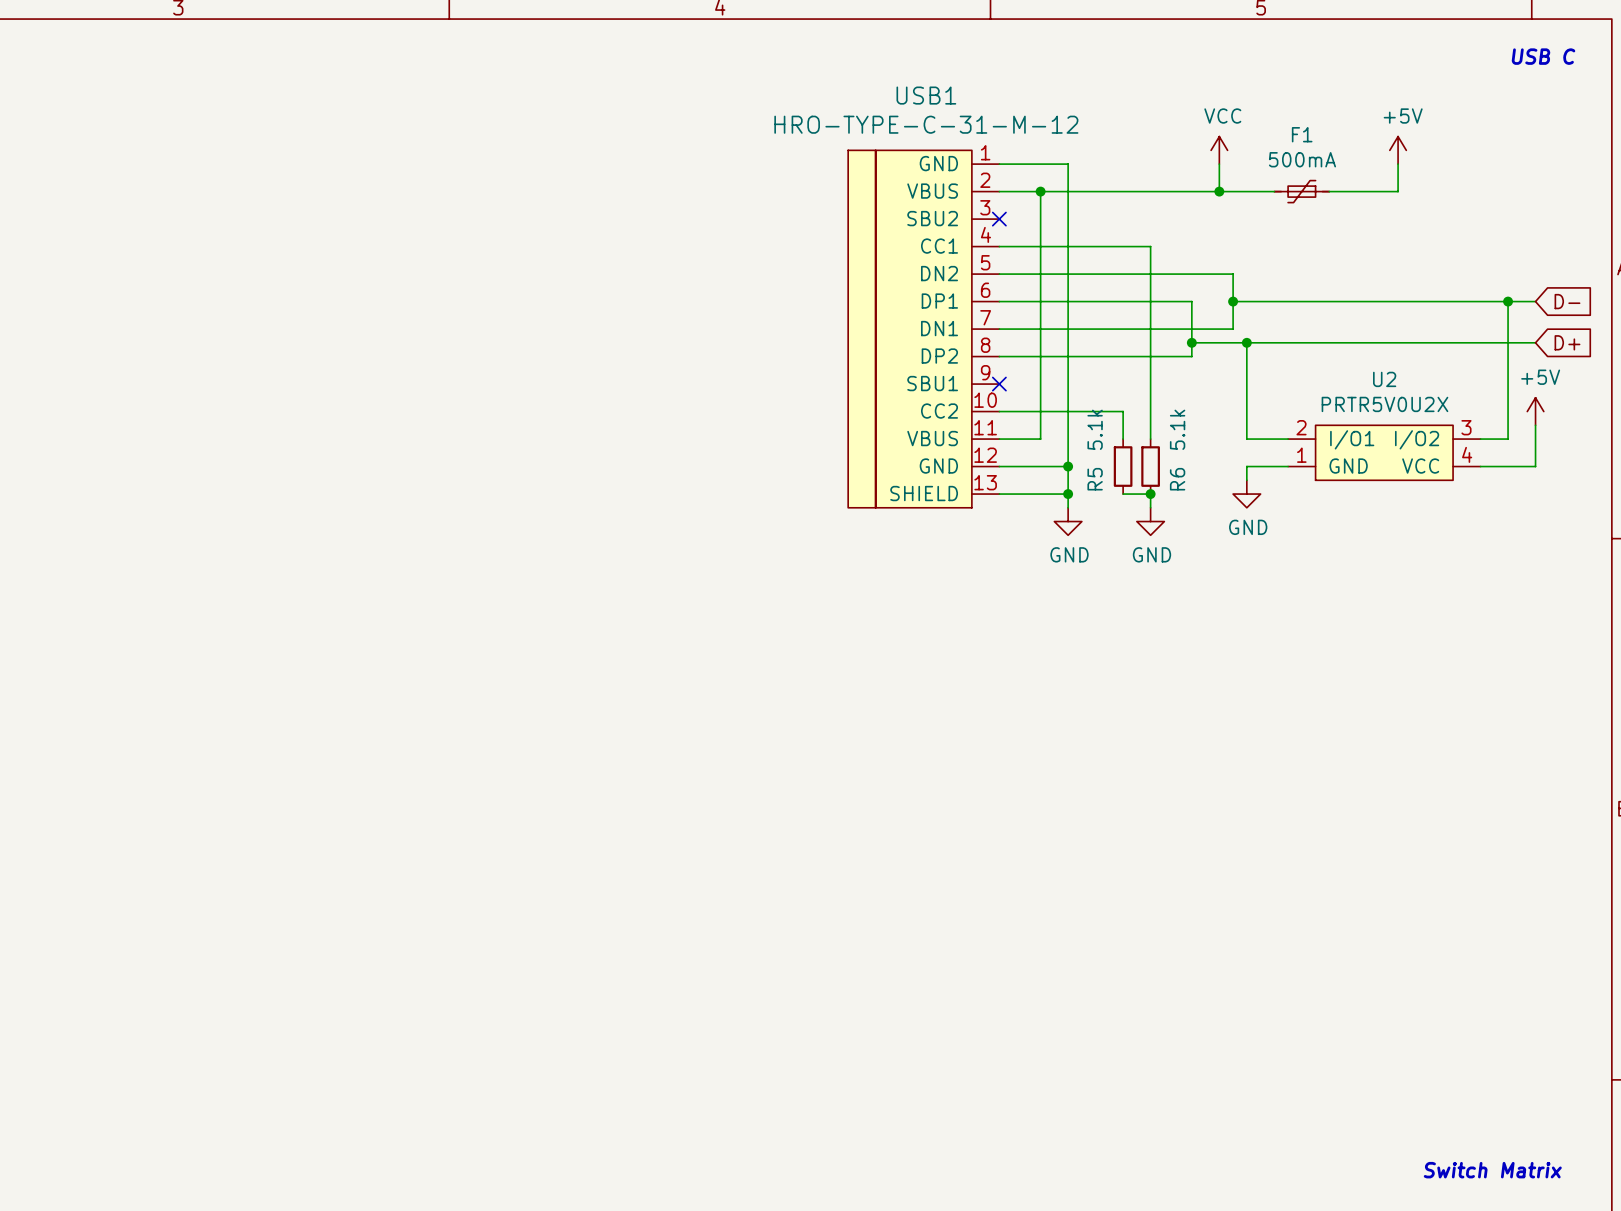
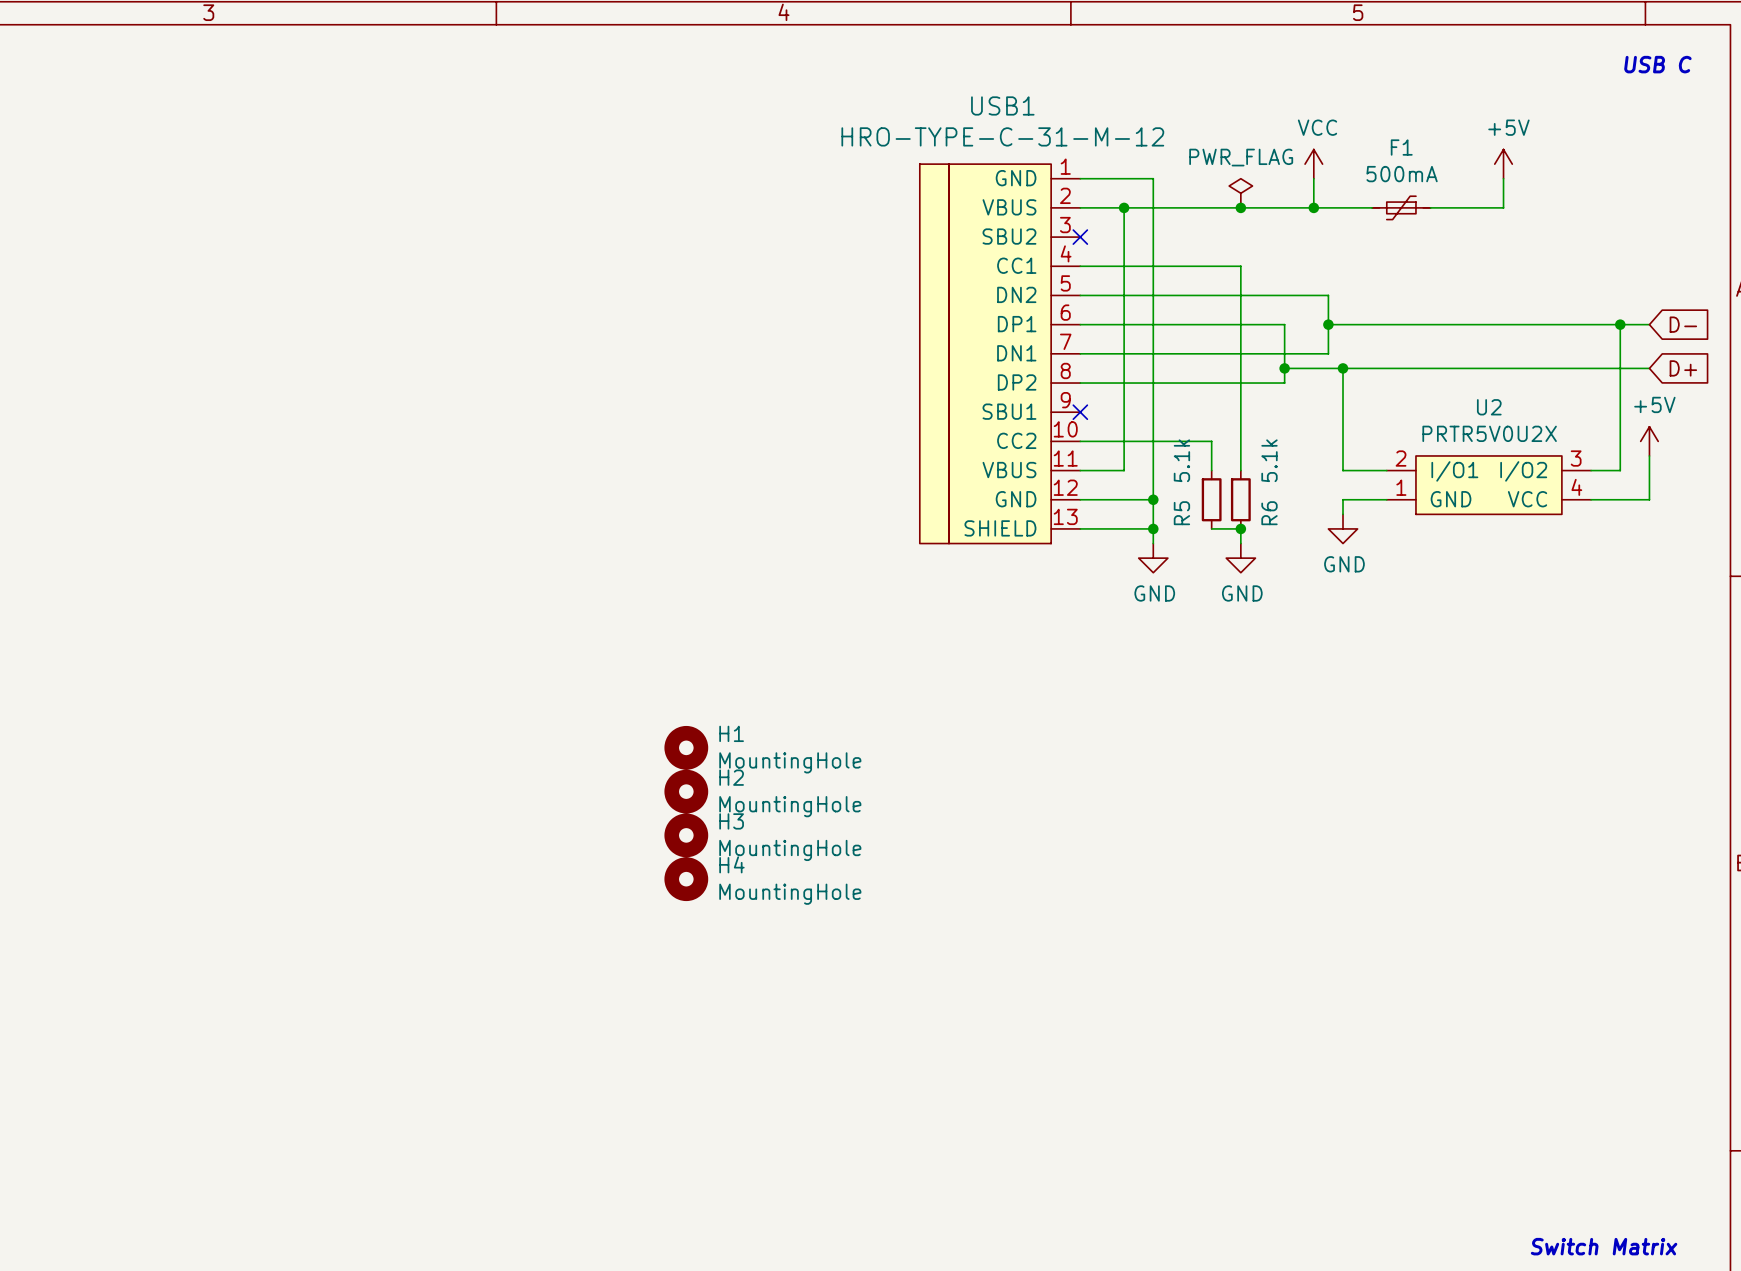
power symbol: none -> PWR_FLAG (1240, 193)
junction: none -> (1240, 207)
H1: none -> MountingHole (686, 747)
H2: none -> MountingHole (686, 791)
H3: none -> MountingHole (686, 835)
H4: none -> MountingHole (686, 879)

